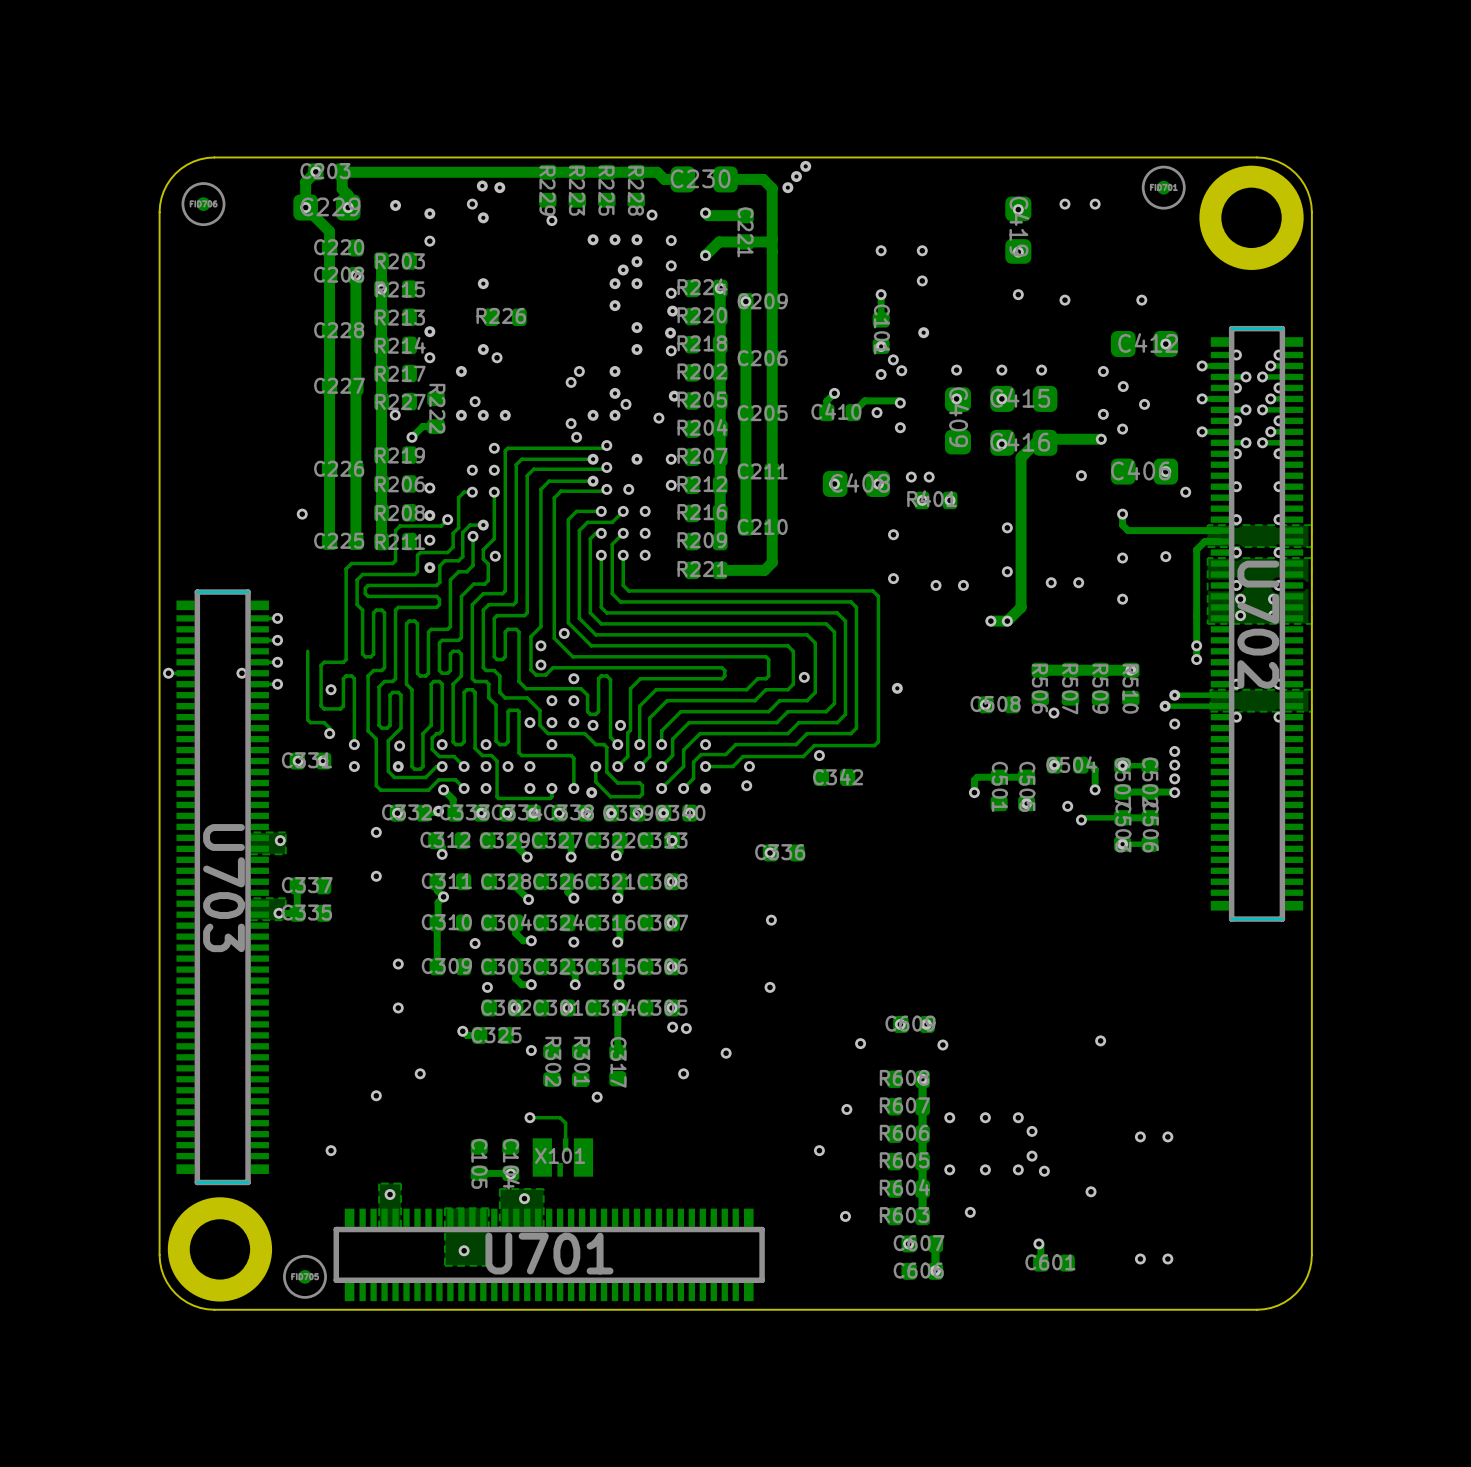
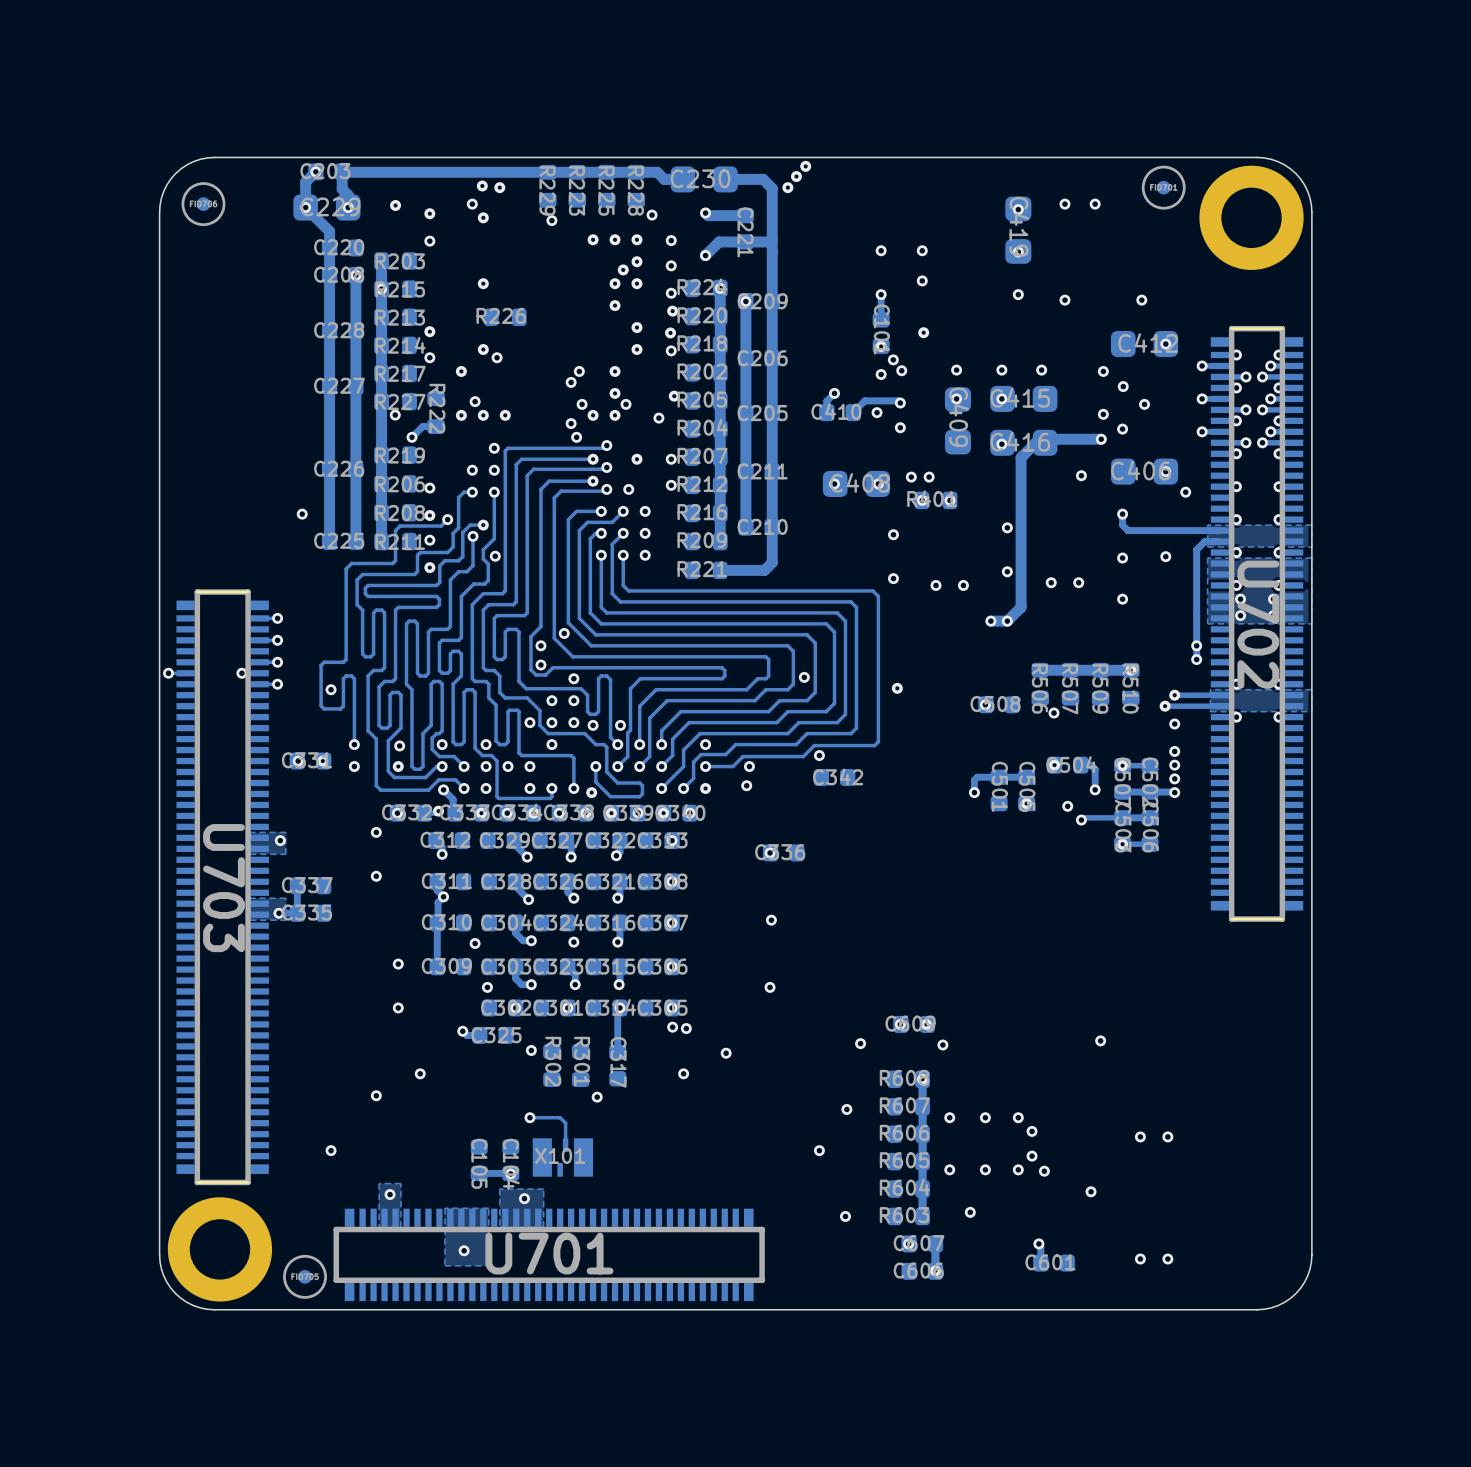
via: none -> (582, 404)
track: (307, 651) (307, 719) (310, 722) (324, 722) (329, 728) (329, 733) -> none
via: (329, 733) -> none

